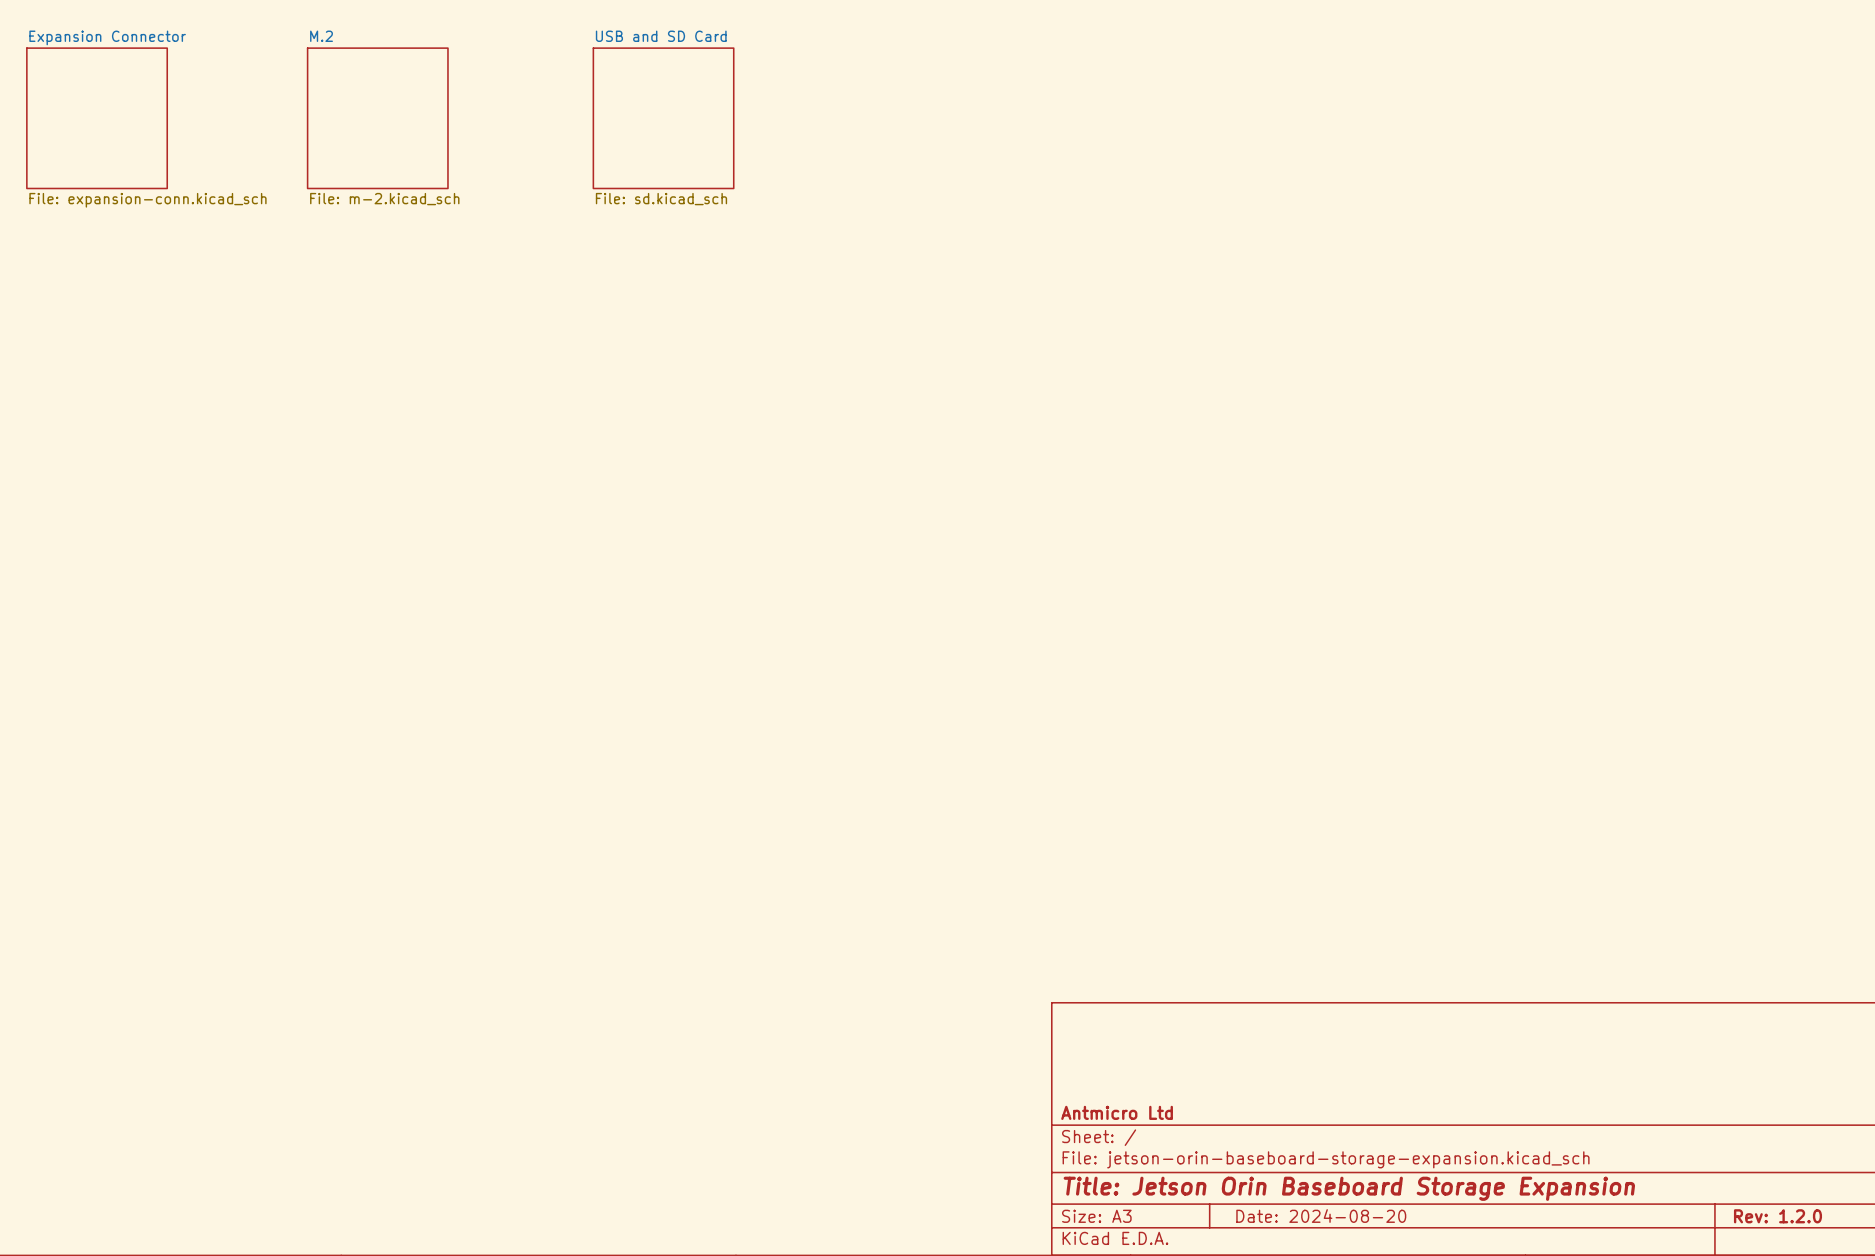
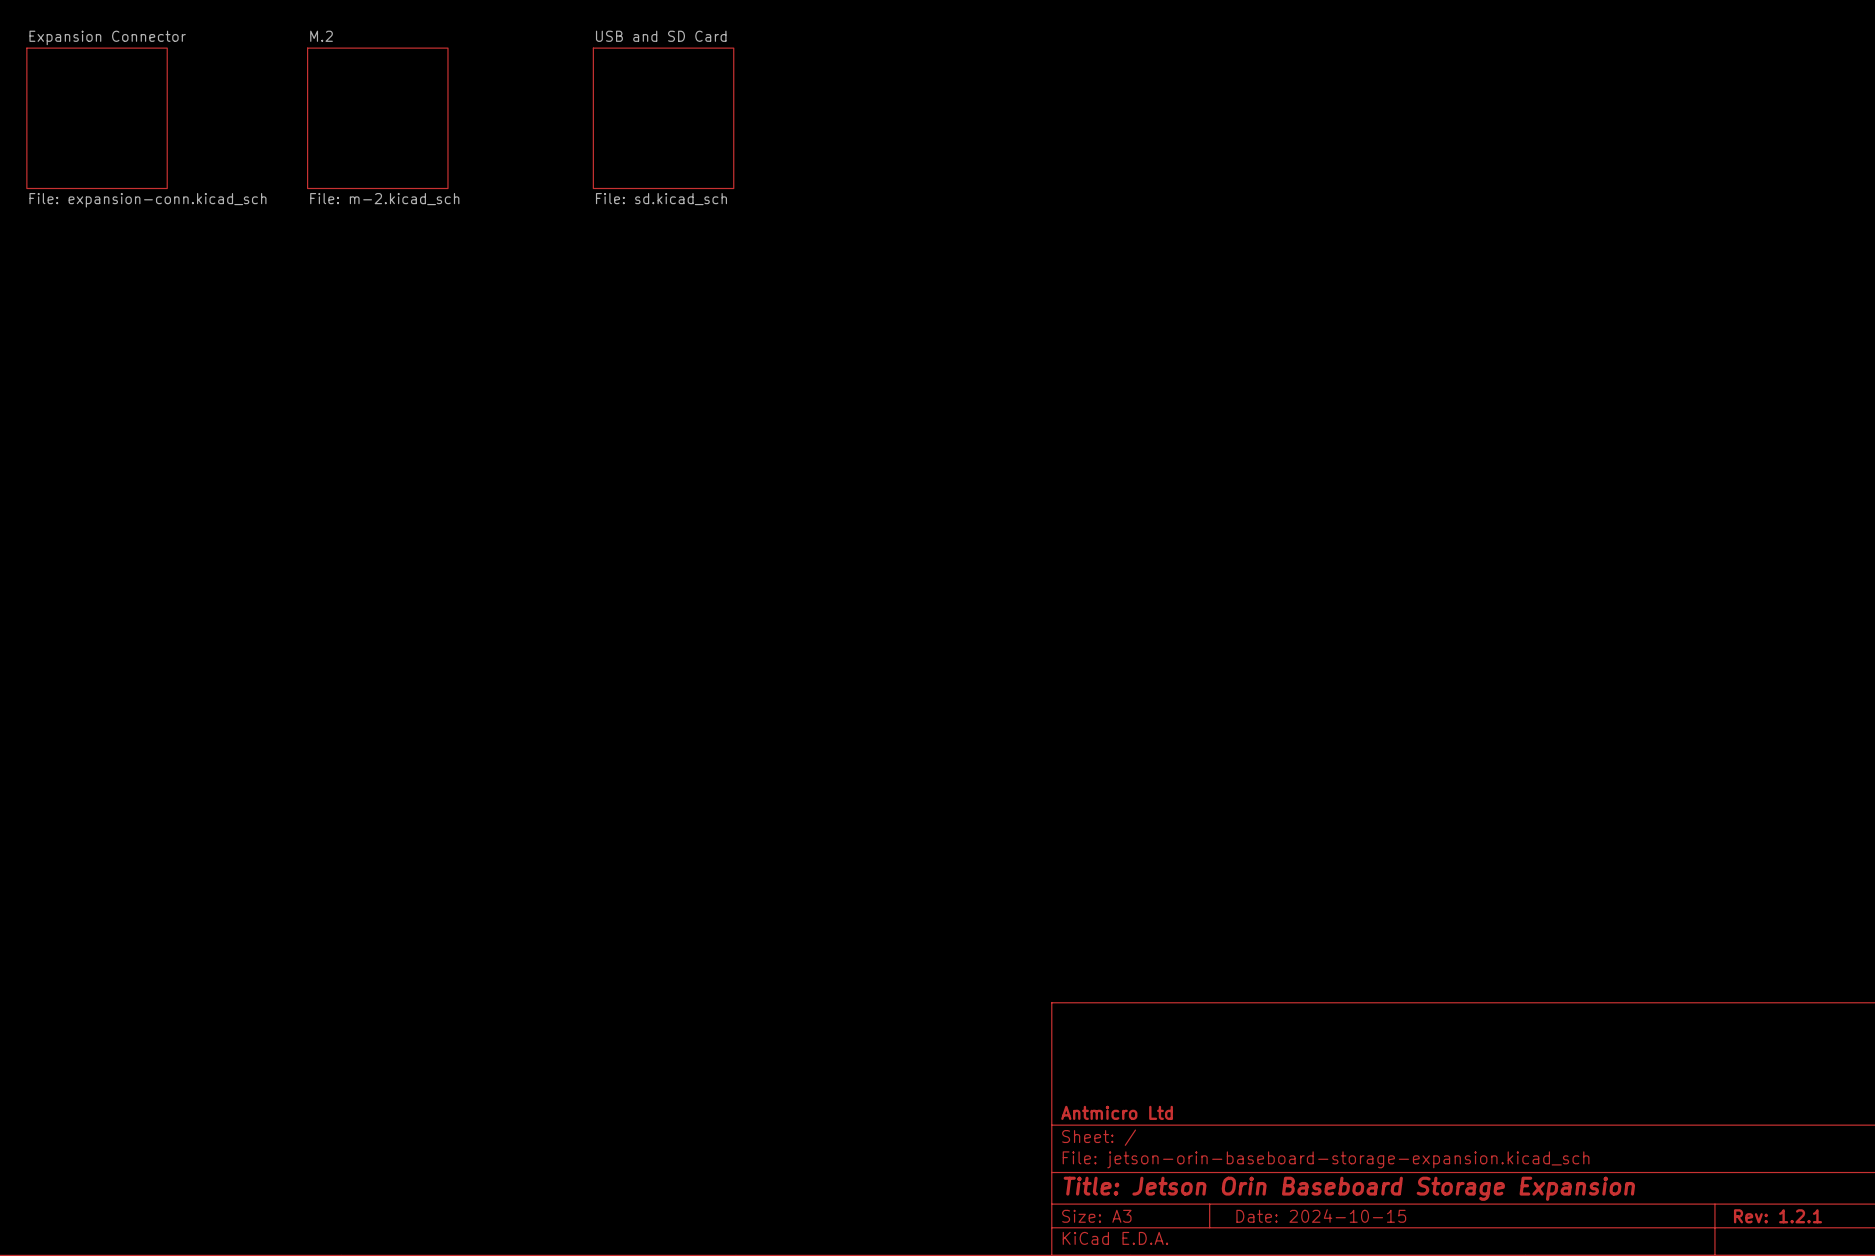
title block: Date: 2024-08-20 (1321, 1216) -> Date: 2024-10-15 (1321, 1216)
title block: Rev: 1.2.0 (1777, 1216) -> Rev: 1.2.1 (1777, 1216)

